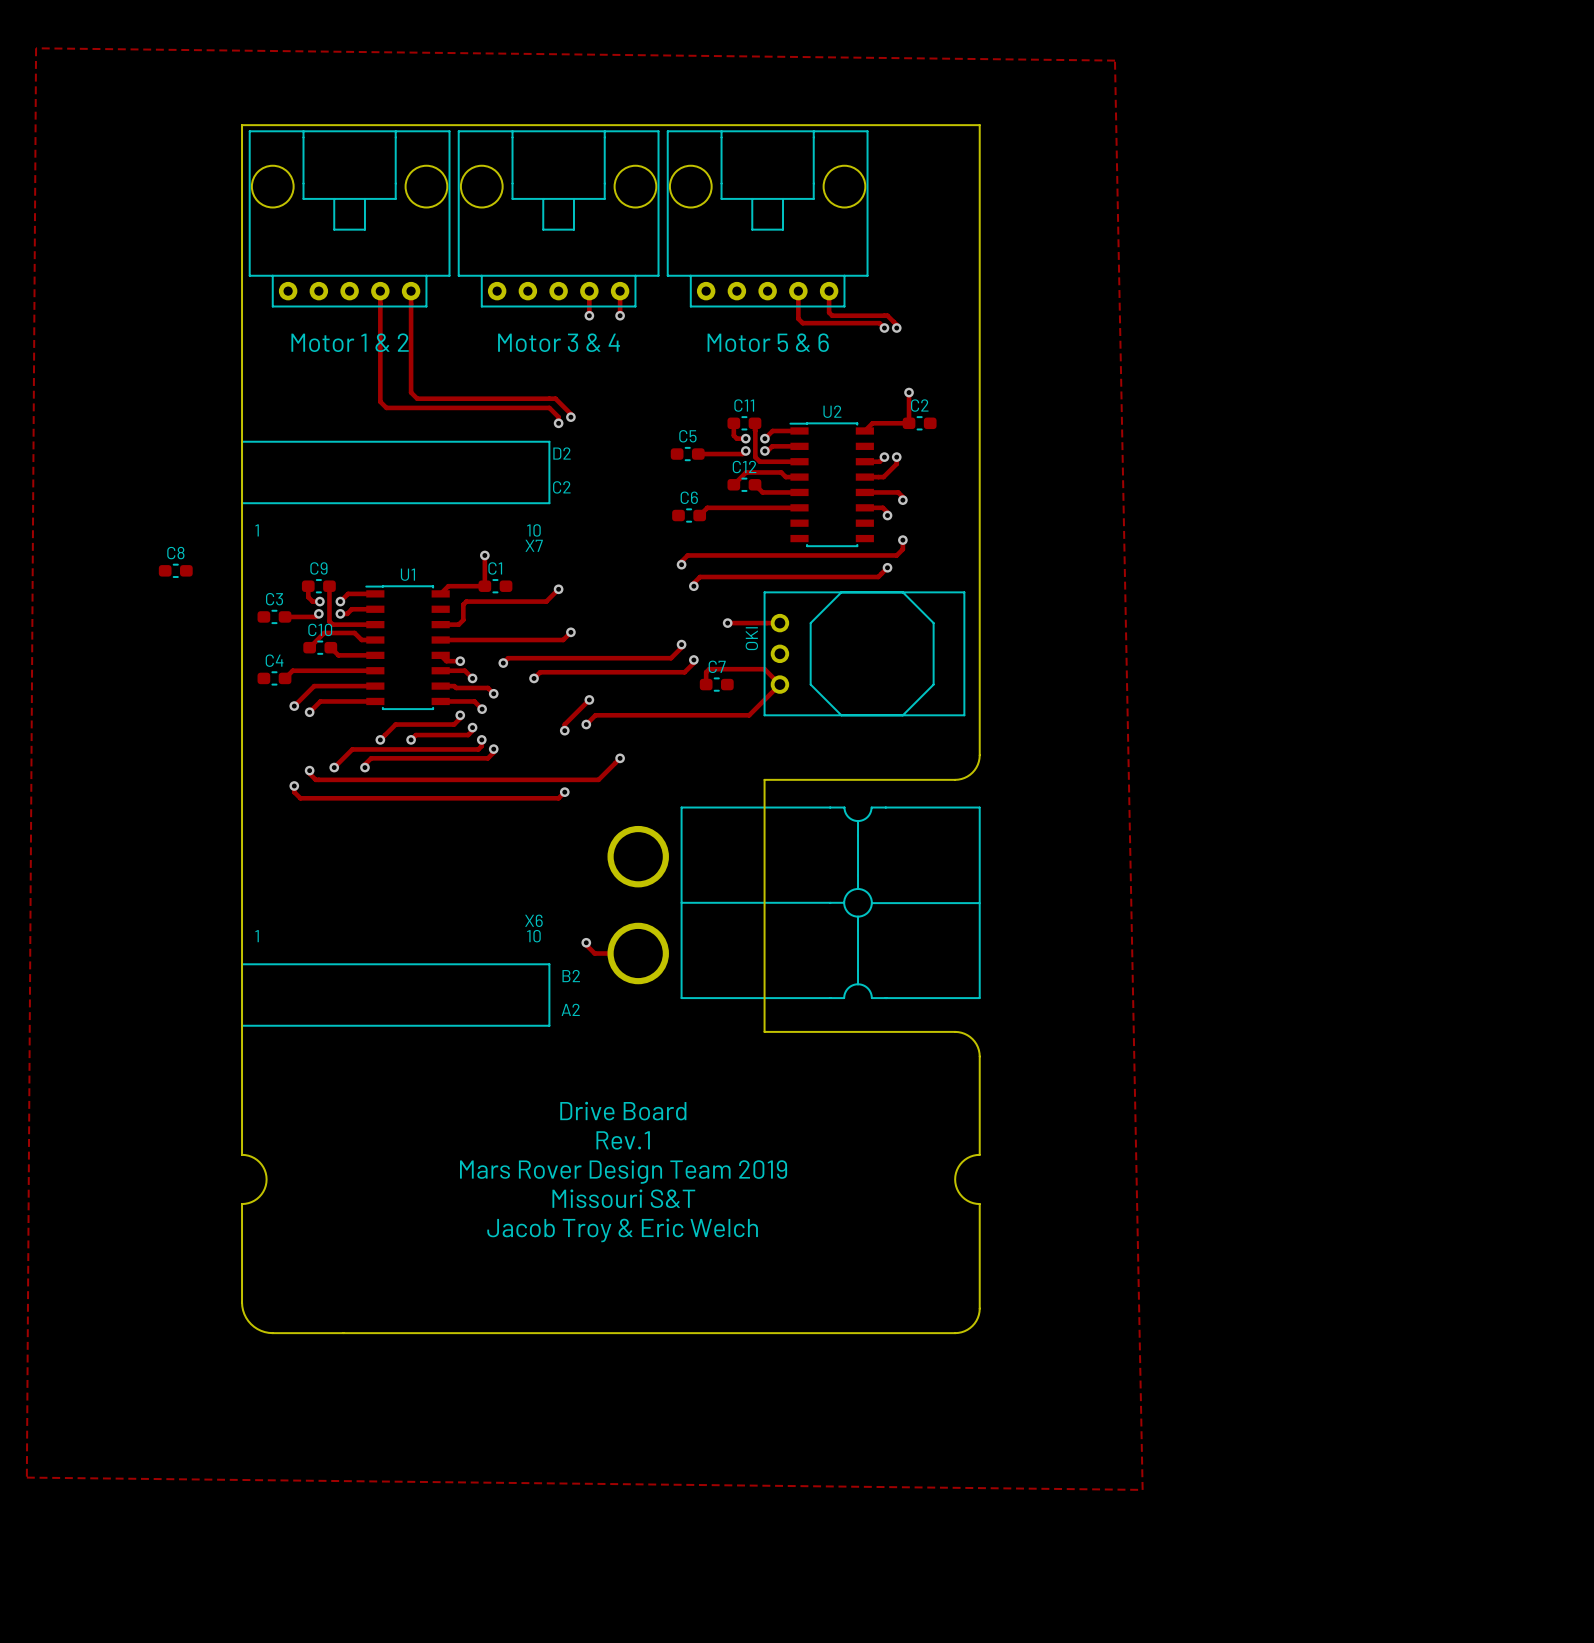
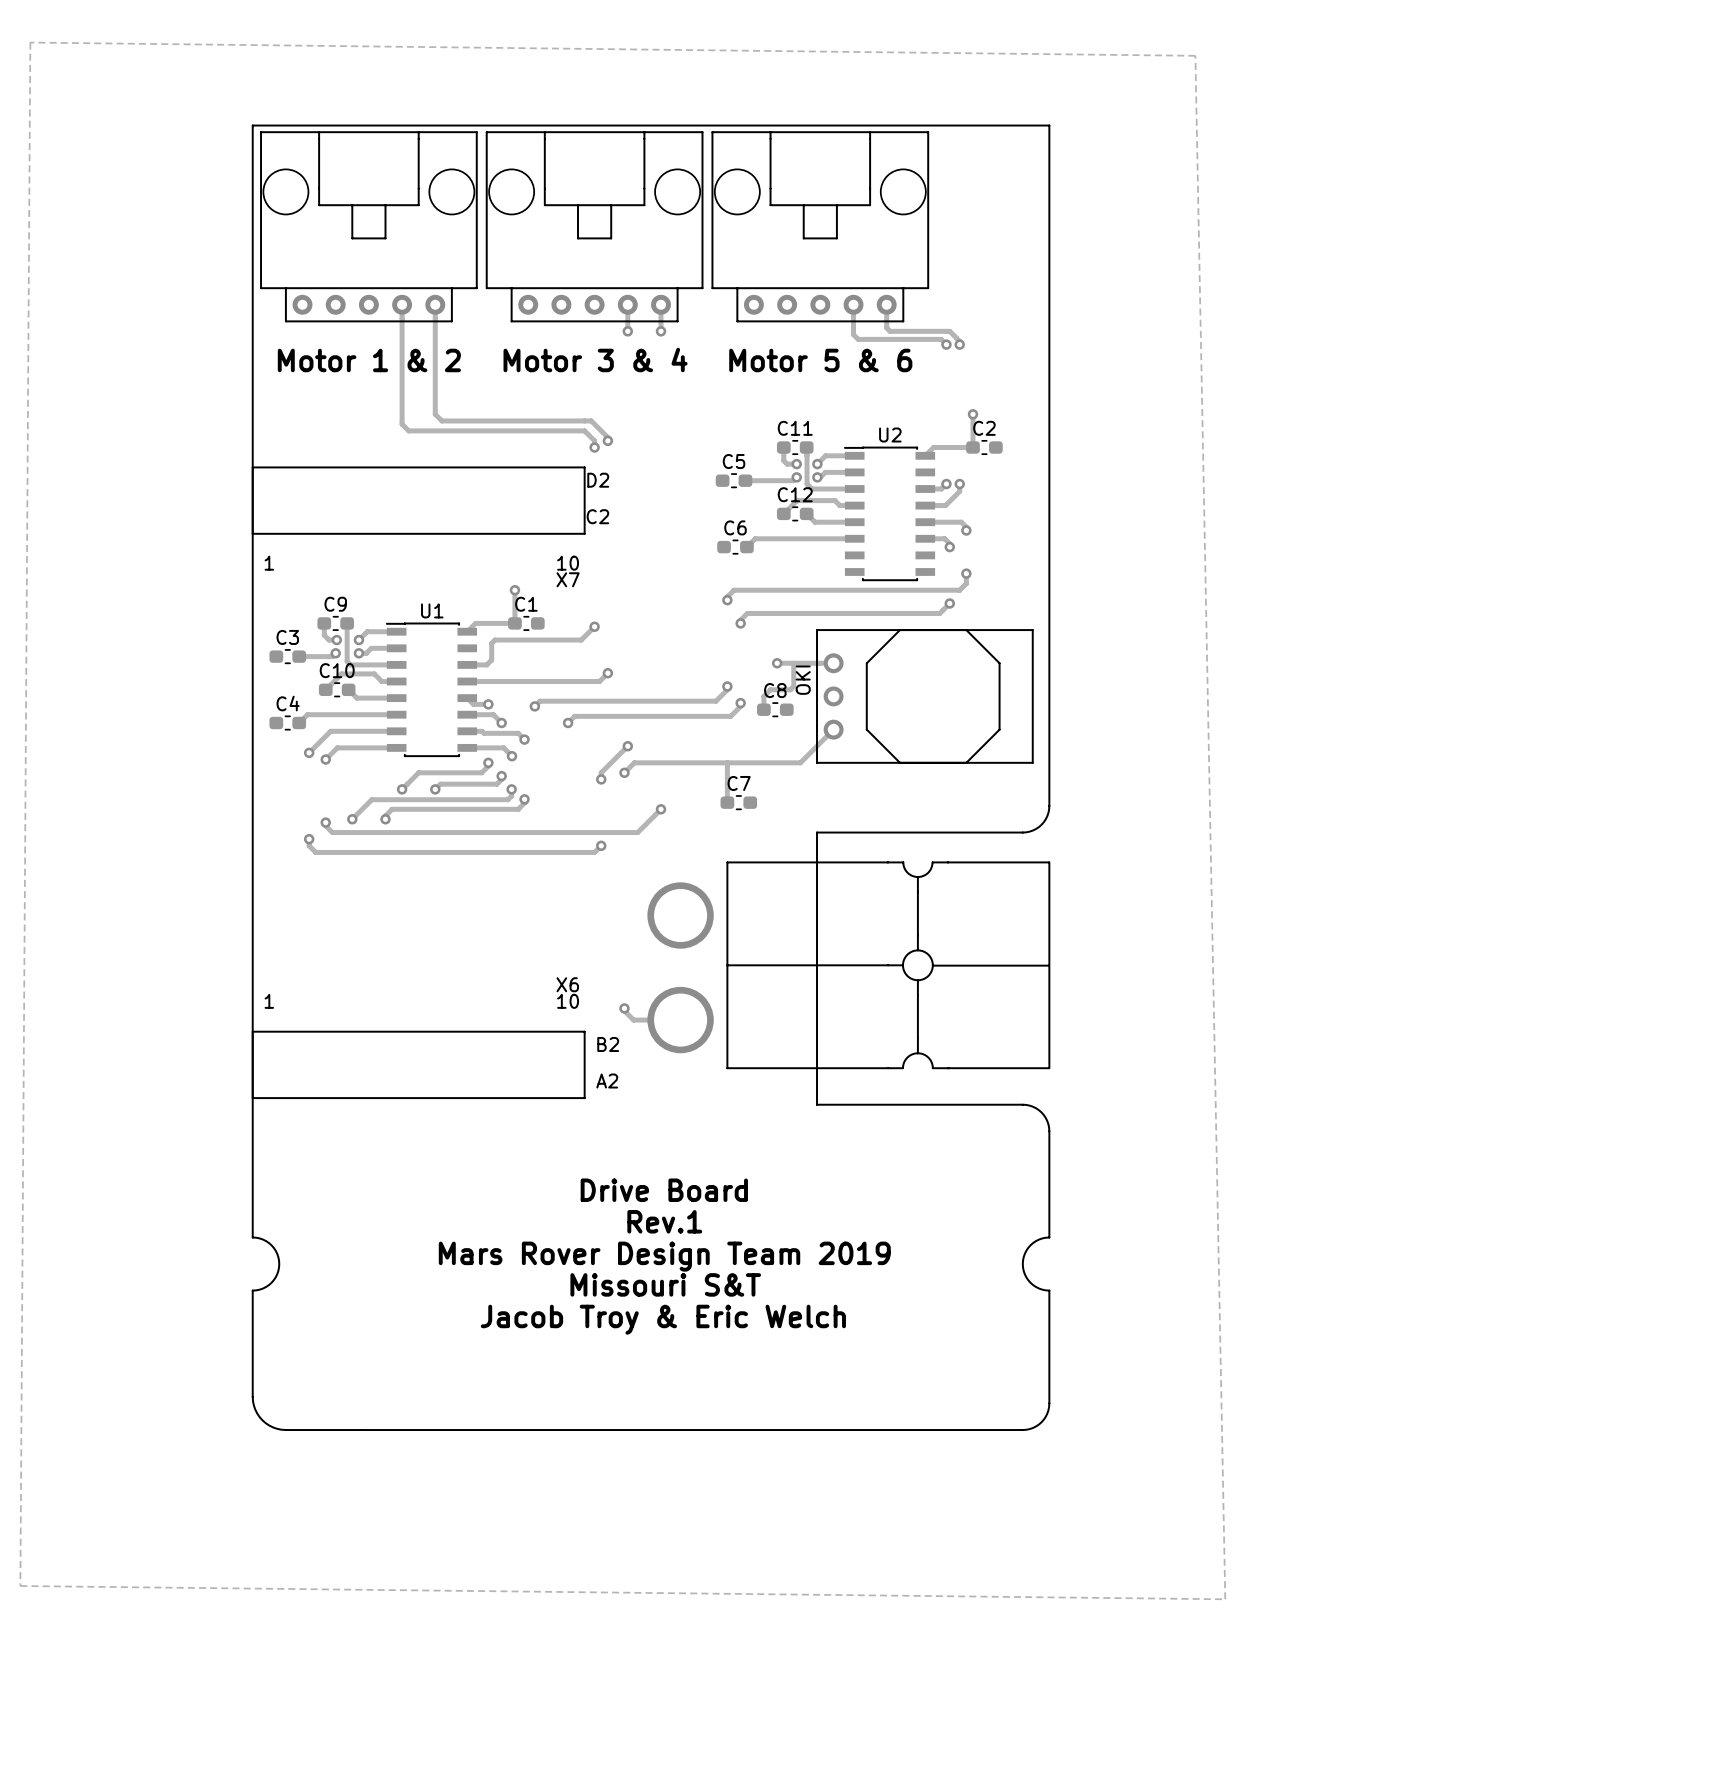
C8 position: (175, 570) -> (775, 709)
track: none -> (793, 663) (793, 686) (790, 689) (770, 689) (763, 696) (763, 709)
track: (706, 684) (706, 672) (709, 669) (764, 669) (779, 684) -> none
C7 position: (716, 684) -> (738, 802)
track: none -> (727, 762) (727, 802)

